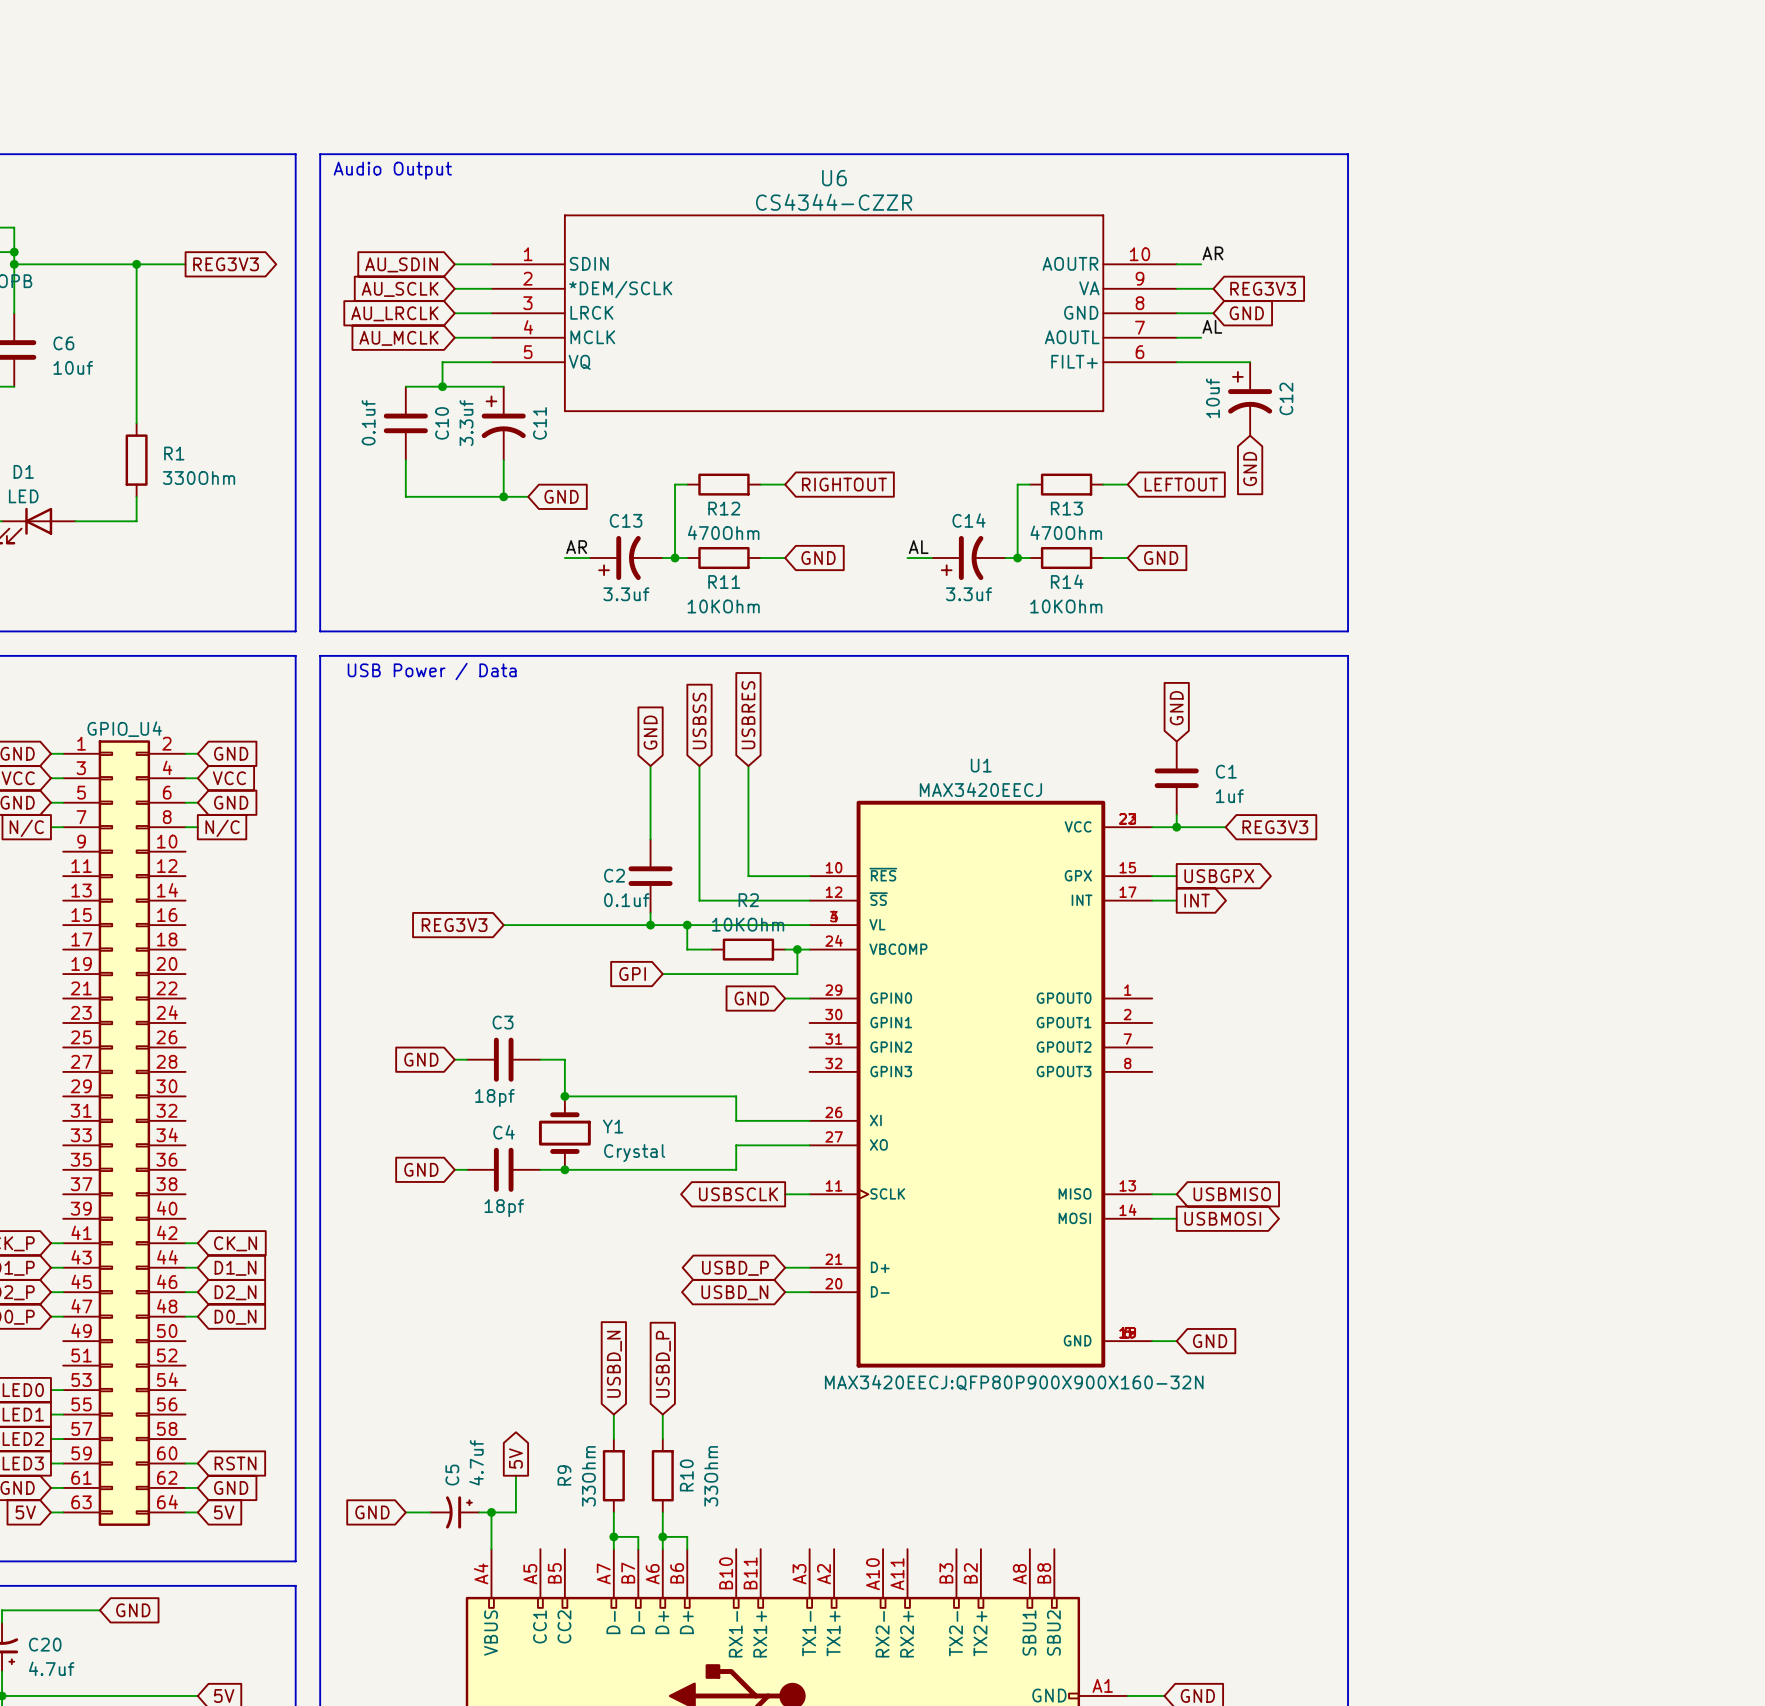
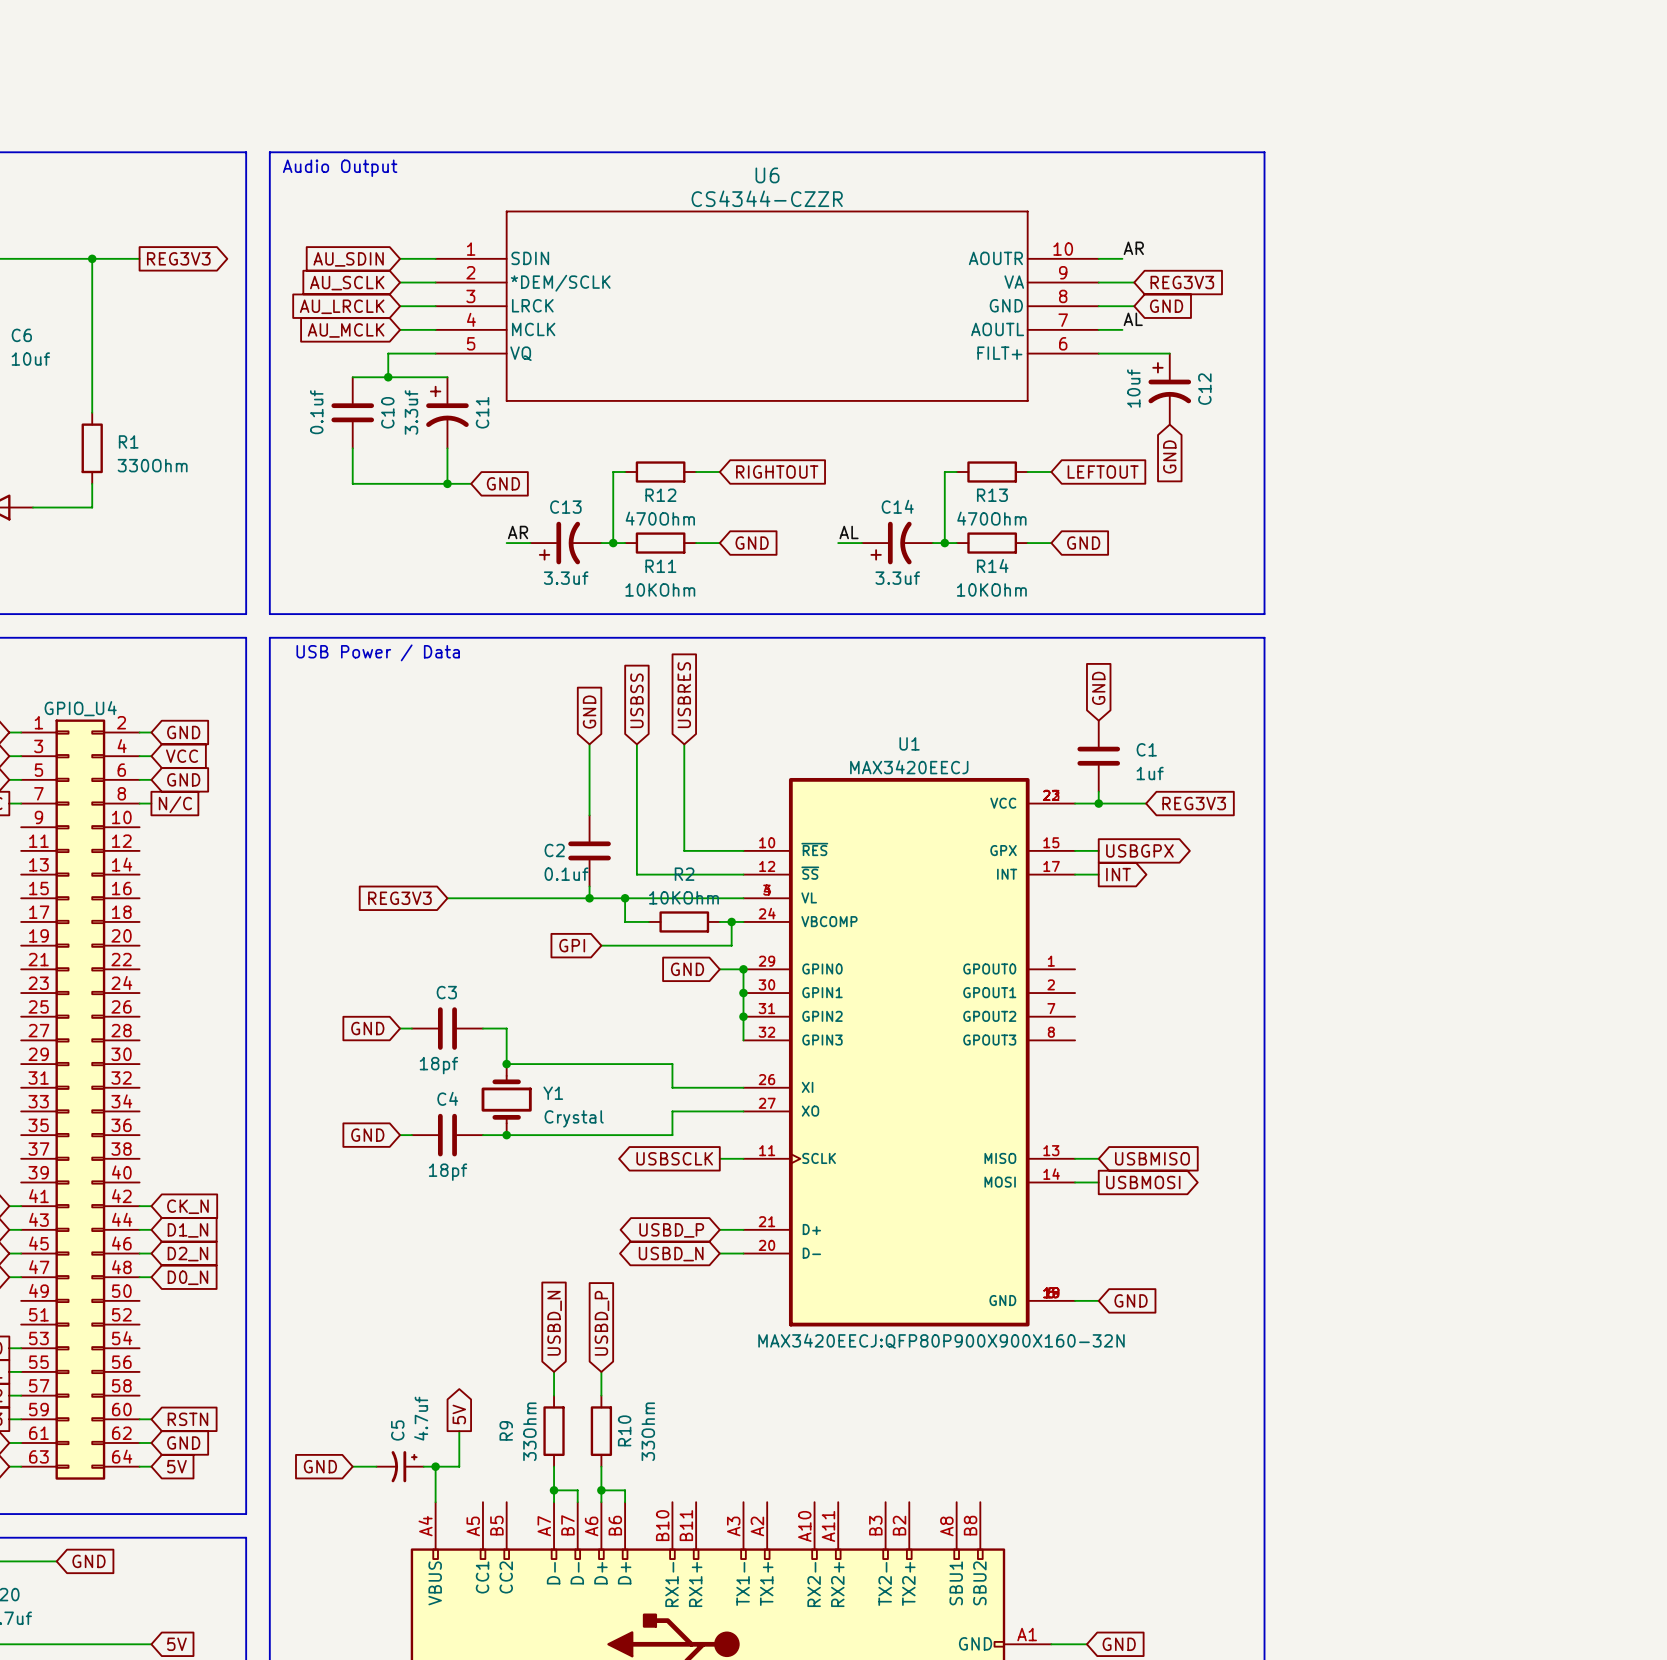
wire: none -> (743, 969) (743, 1040)
junction: none -> (743, 969)
junction: none -> (743, 993)
junction: none -> (743, 1016)

